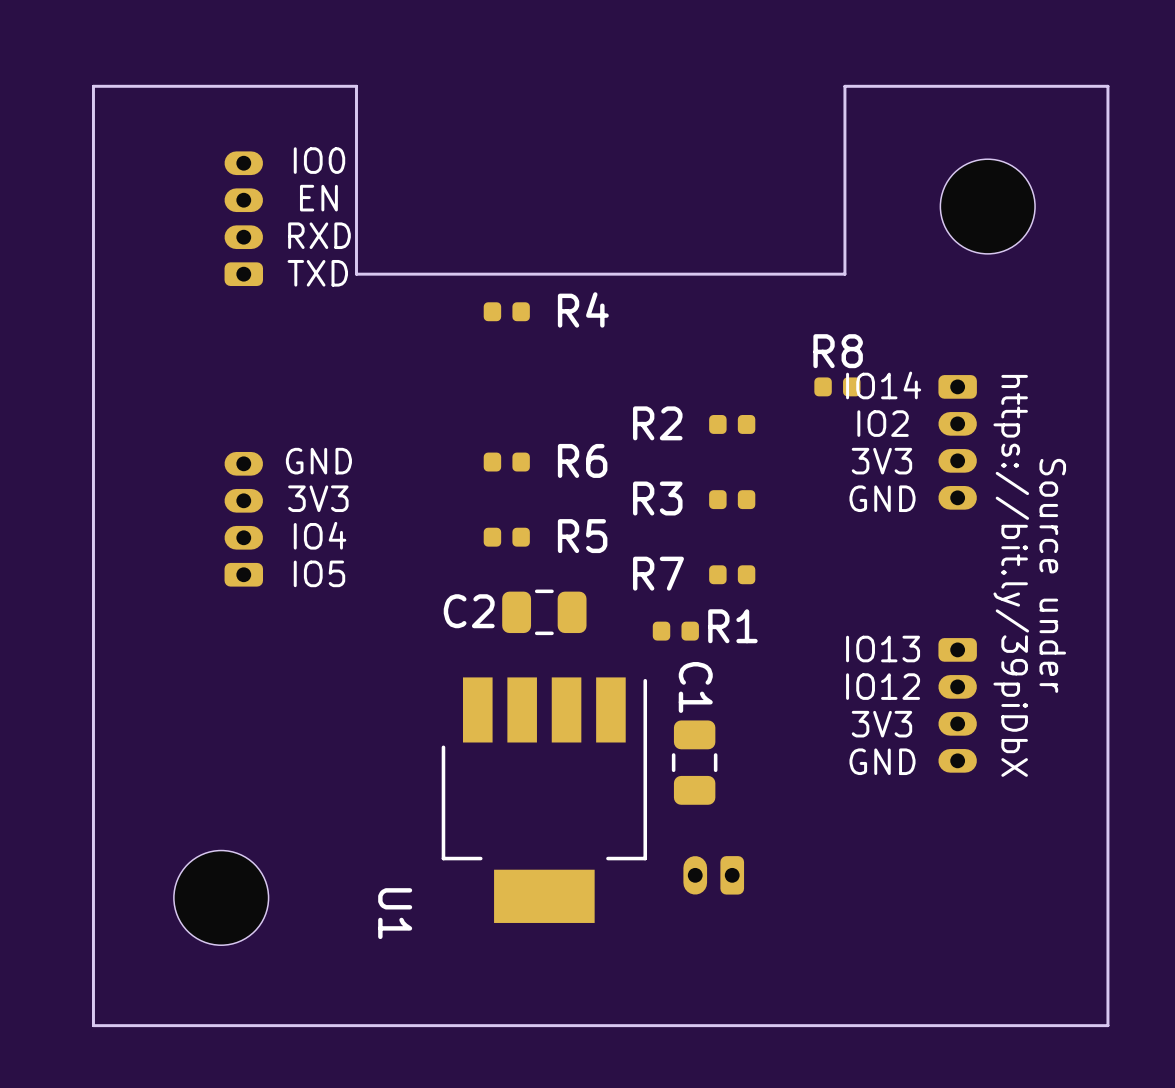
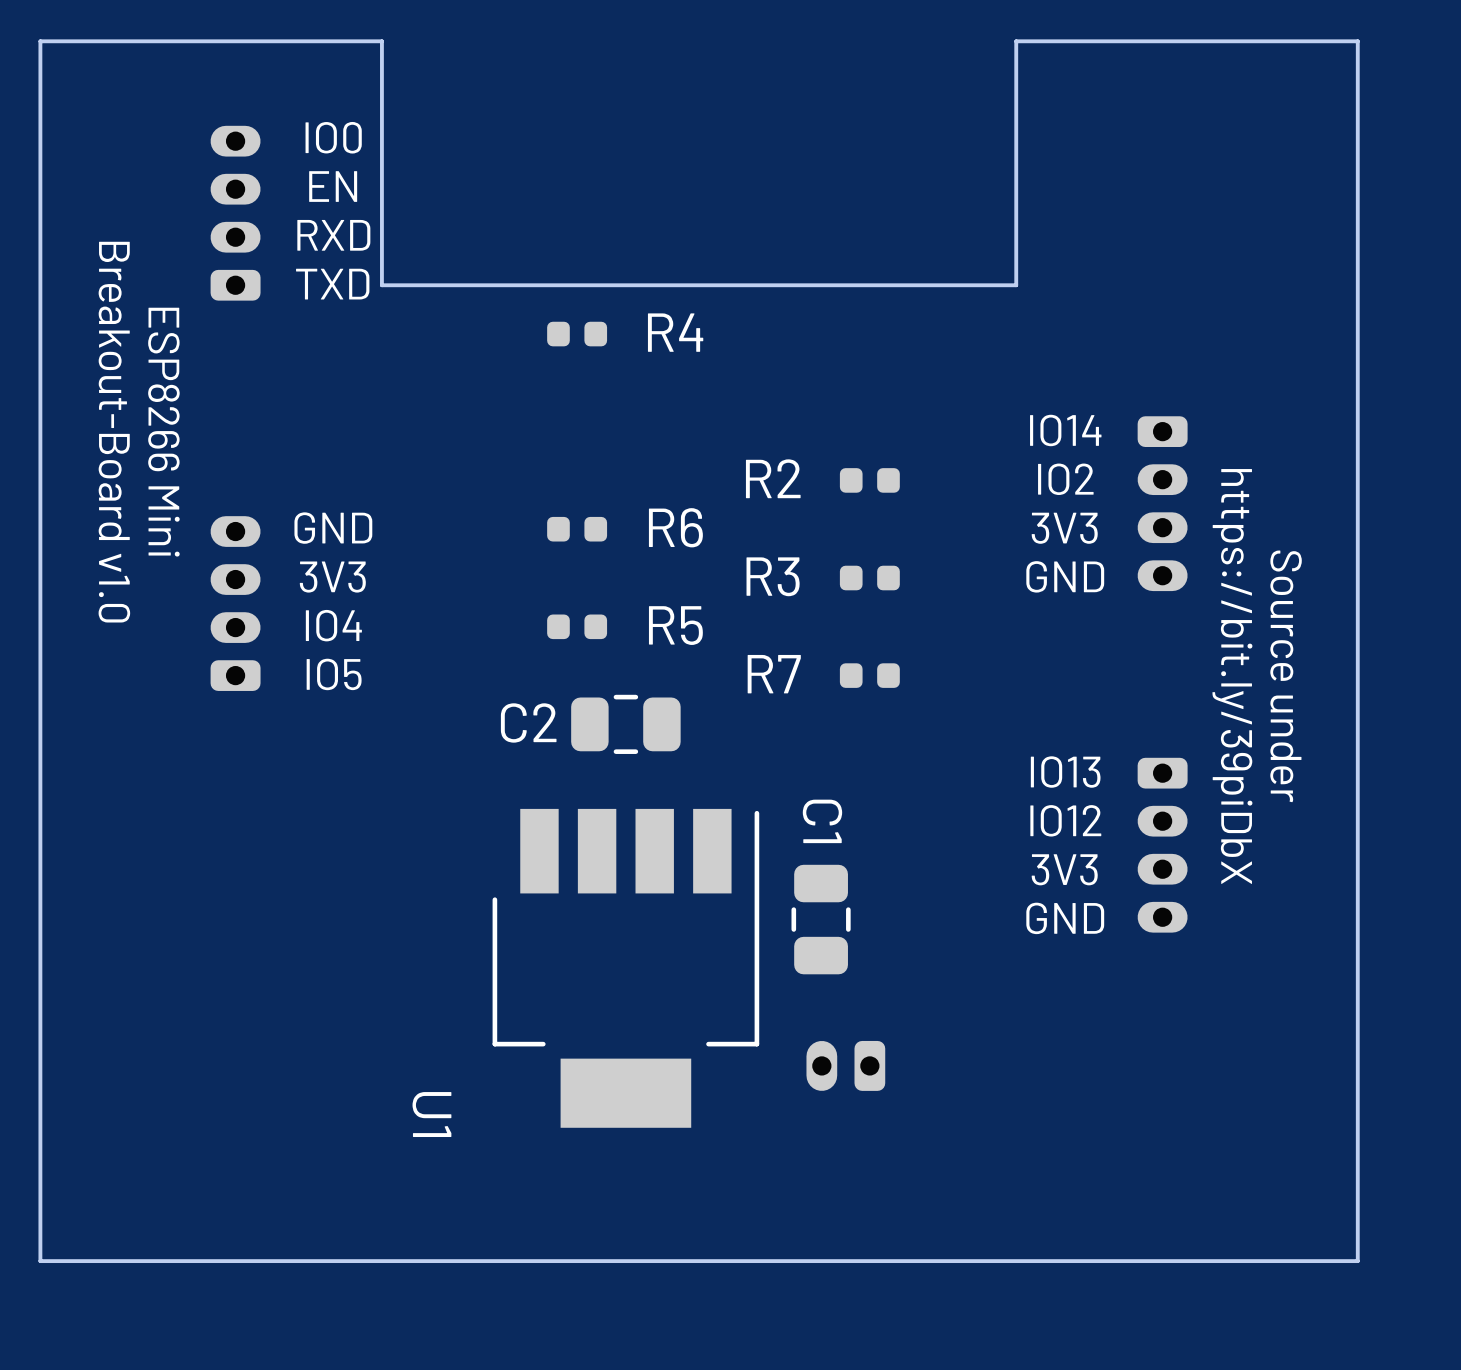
part: (987, 206) -> none
R8: (837, 386) -> none
text: none -> Breakout-Board v1.0 (114, 432)
text: none -> ESP8266 Mini (163, 432)
R1: (675, 631) -> none
part: (221, 897) -> none

